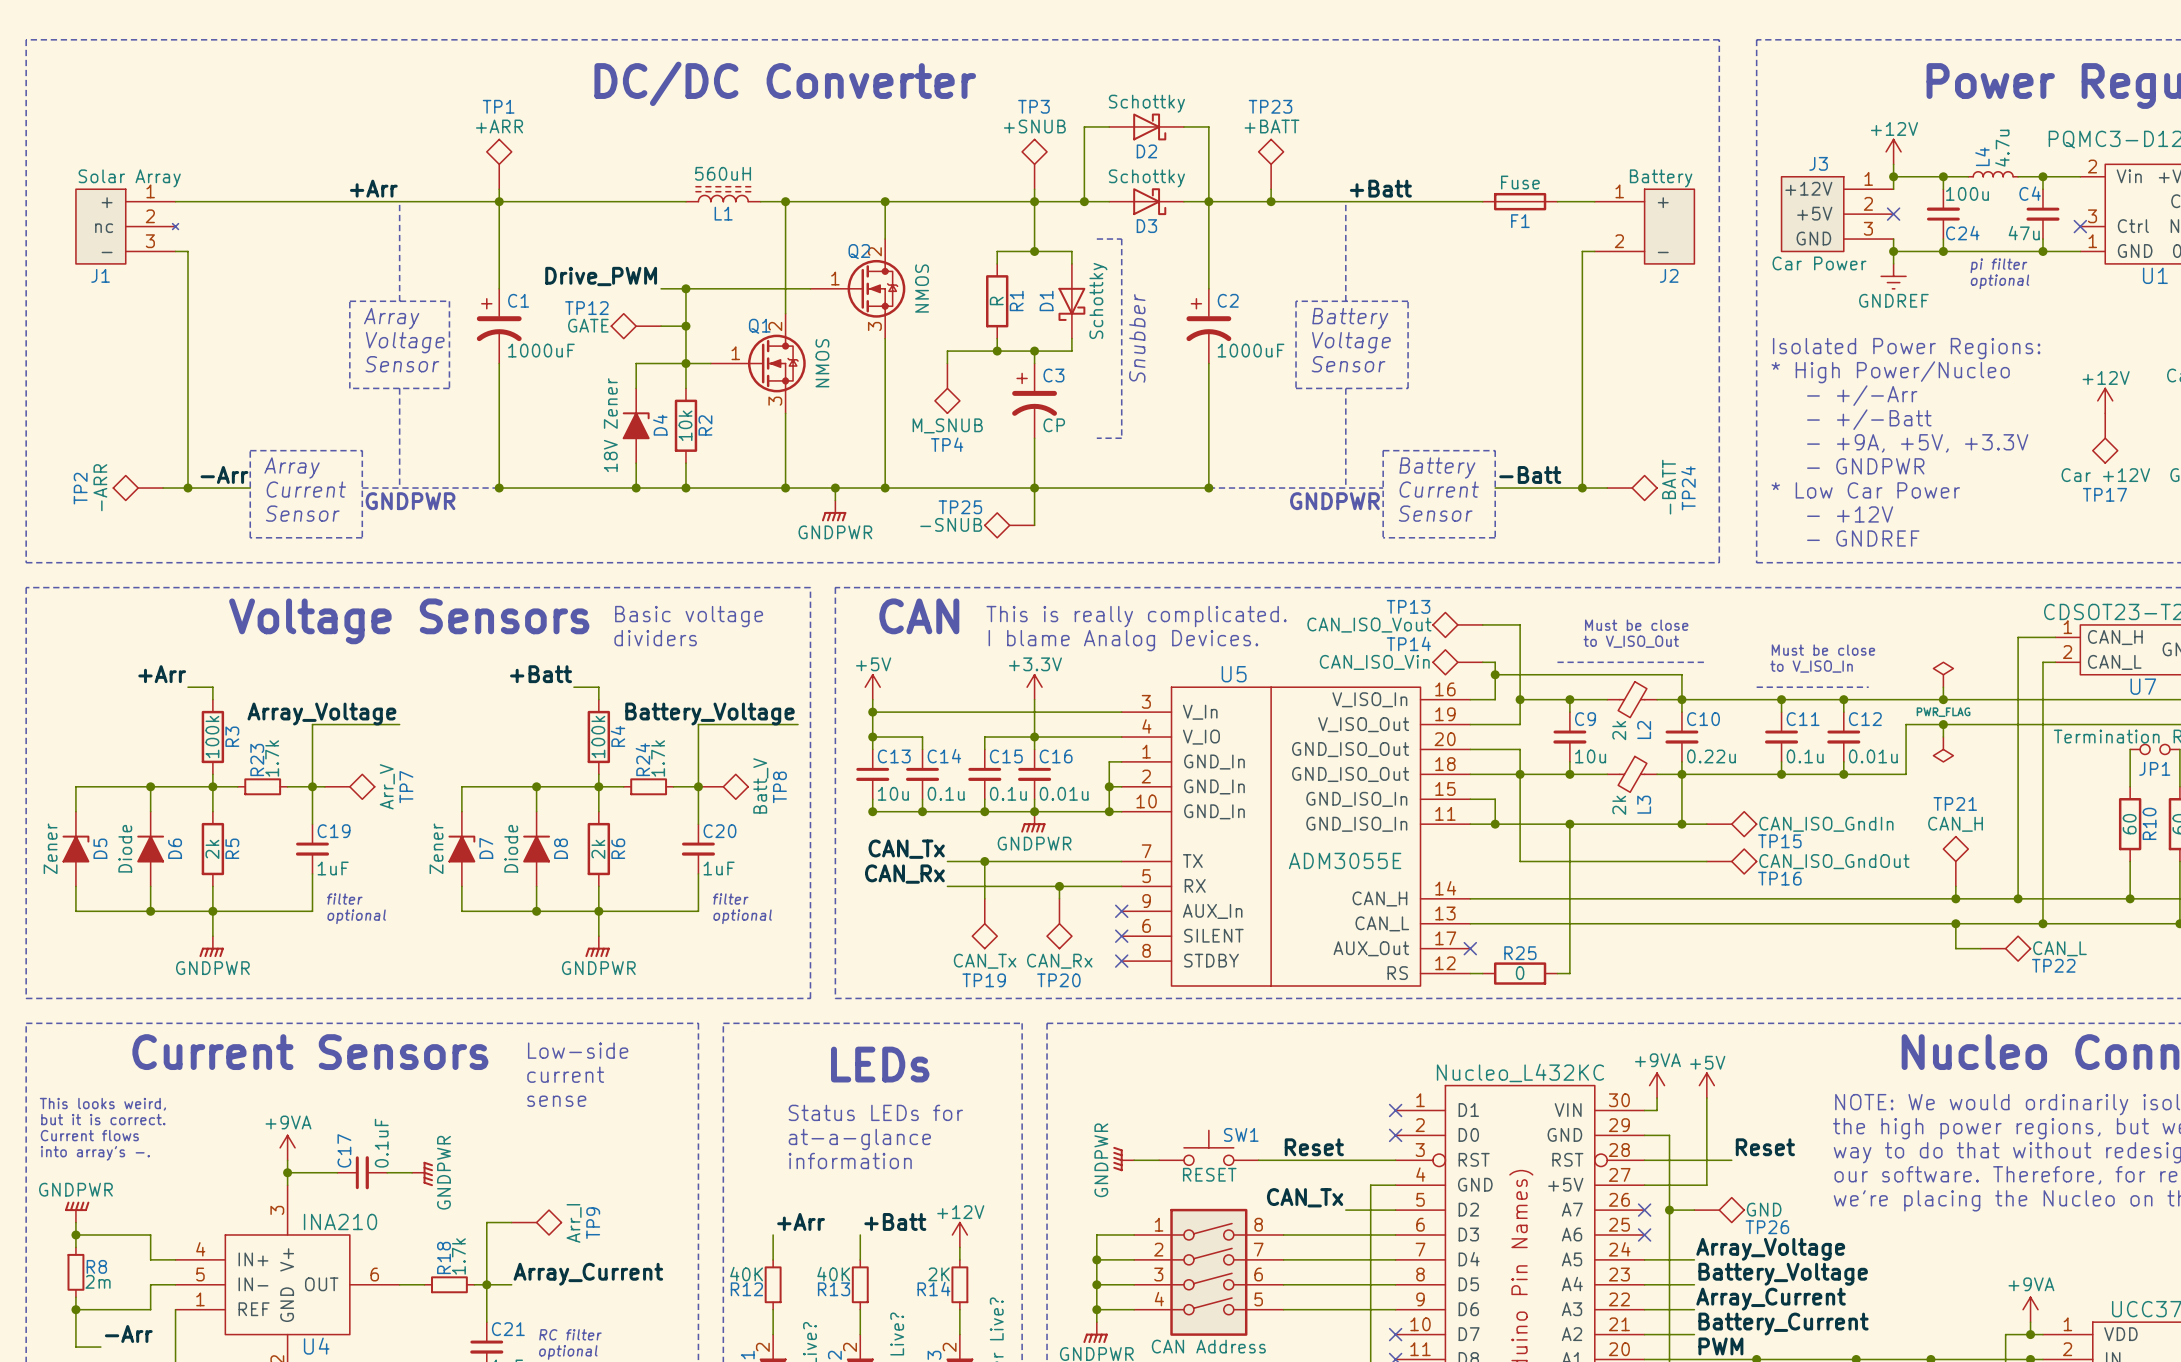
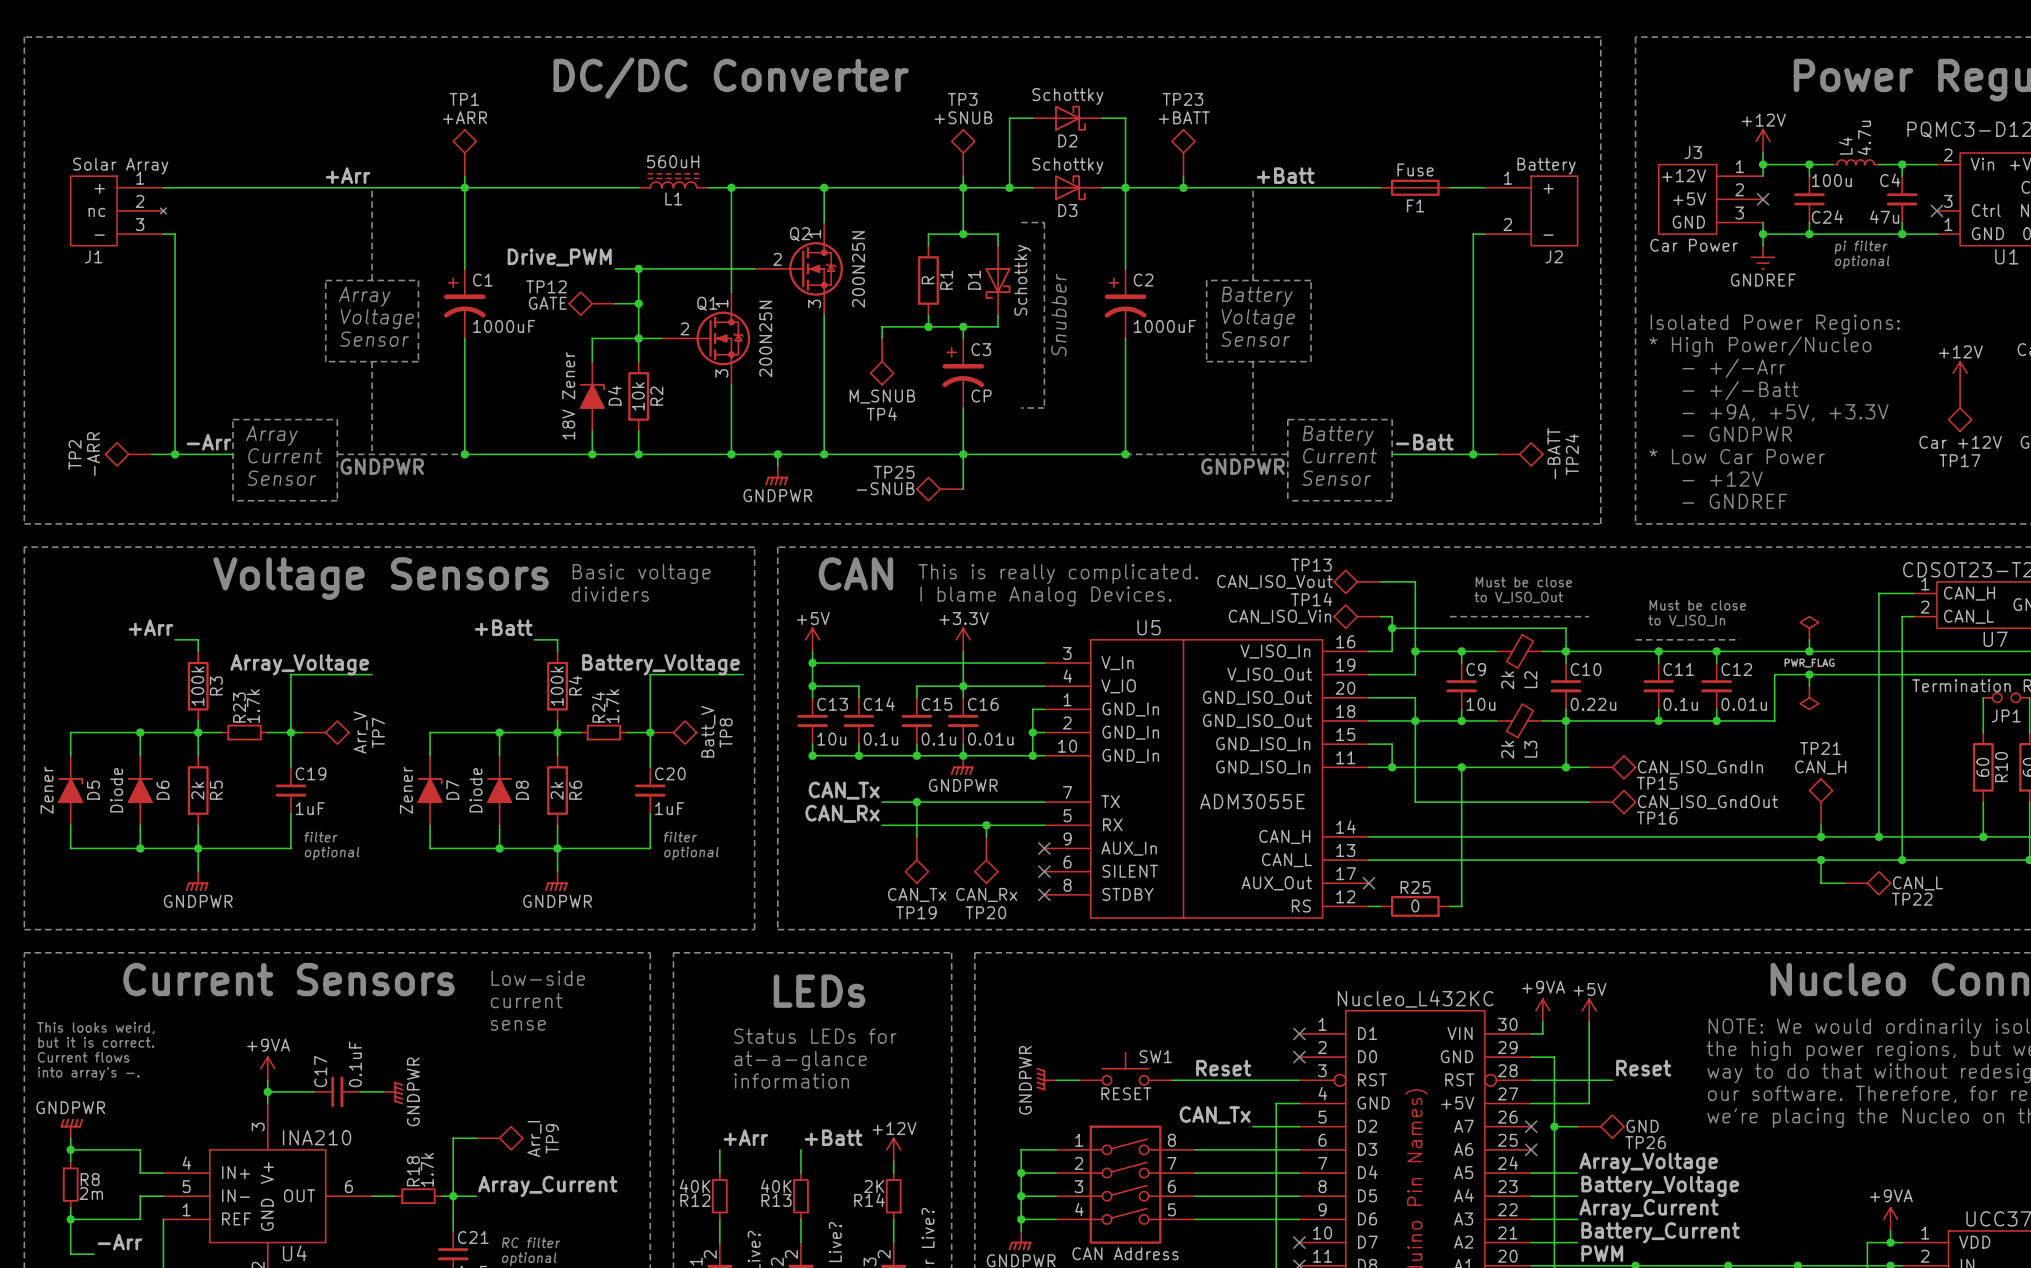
Q2 pin number: 2 (874, 251) -> 1 (814, 234)
Q2 pin number: 1 (835, 278) -> 2 (777, 259)
Q2 value: NMOS (922, 288) -> 200N25N (858, 269)
Q1 pin number: 2 (775, 326) -> 1 (721, 303)
Q1 pin number: 1 (735, 353) -> 2 (684, 328)
Q1 value: NMOS (822, 363) -> 200N25N (765, 339)

